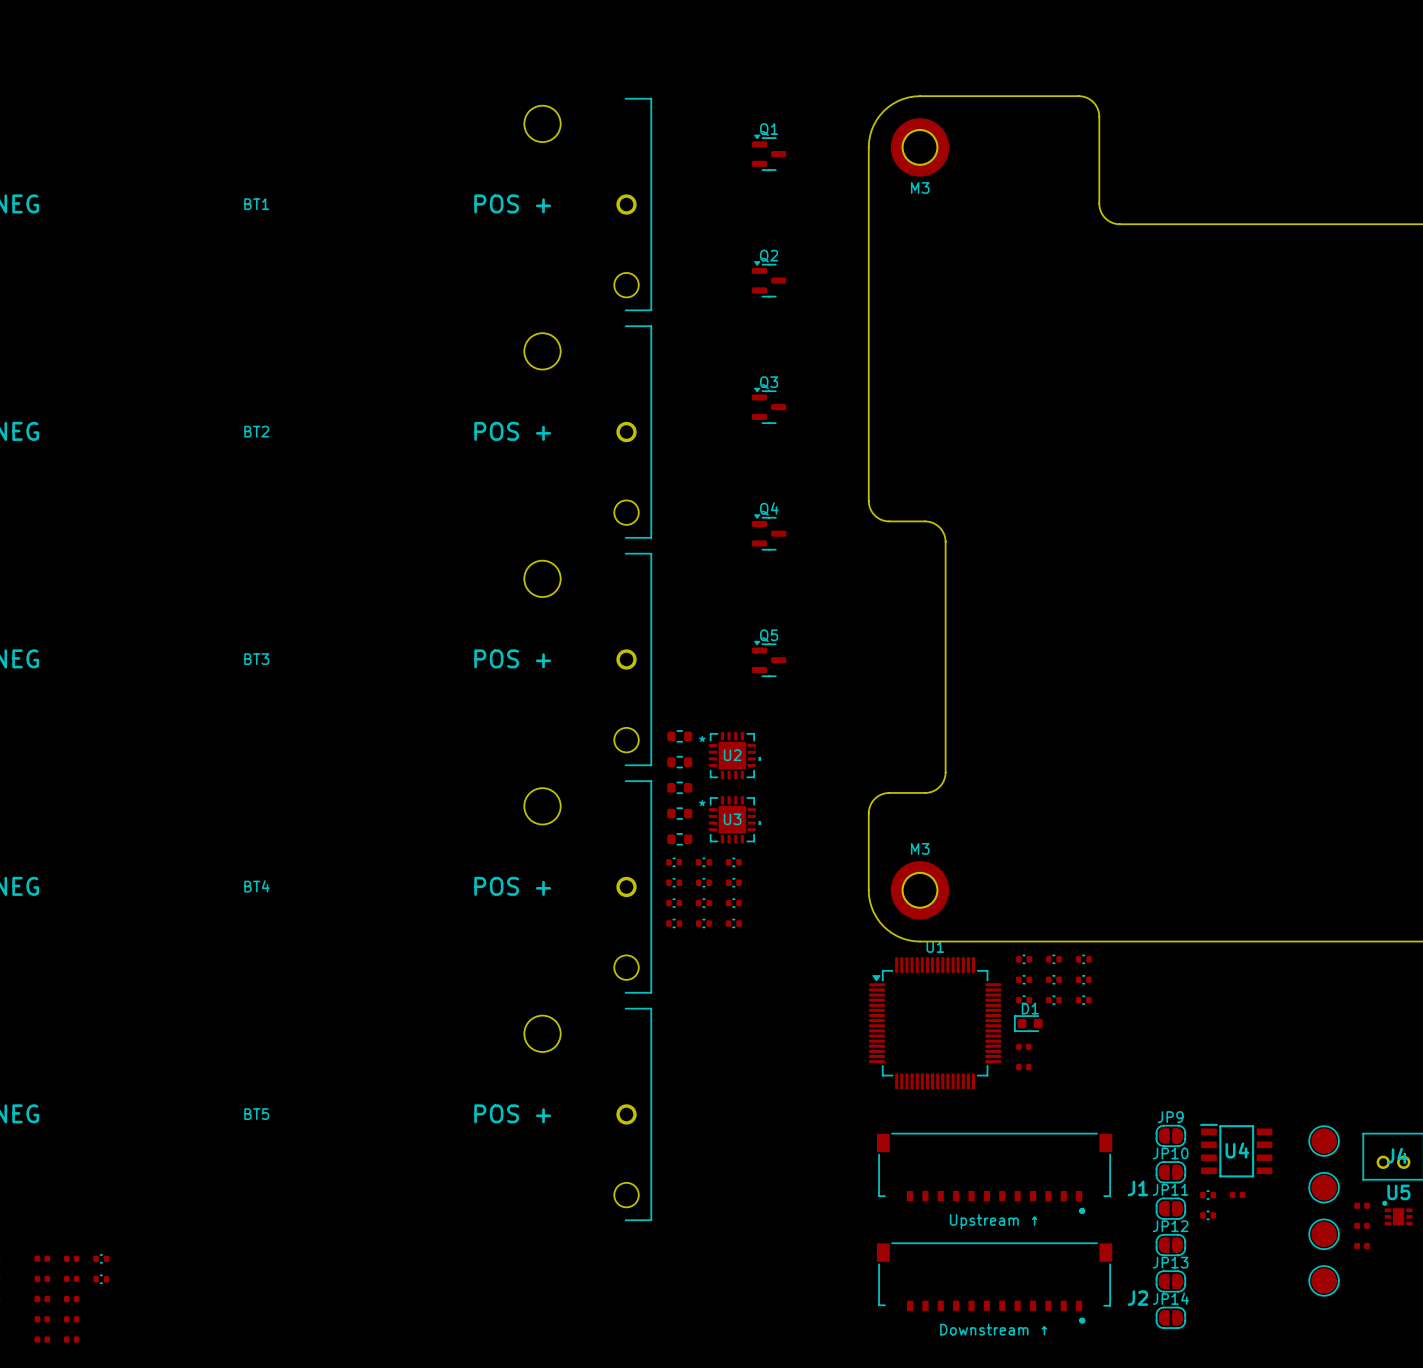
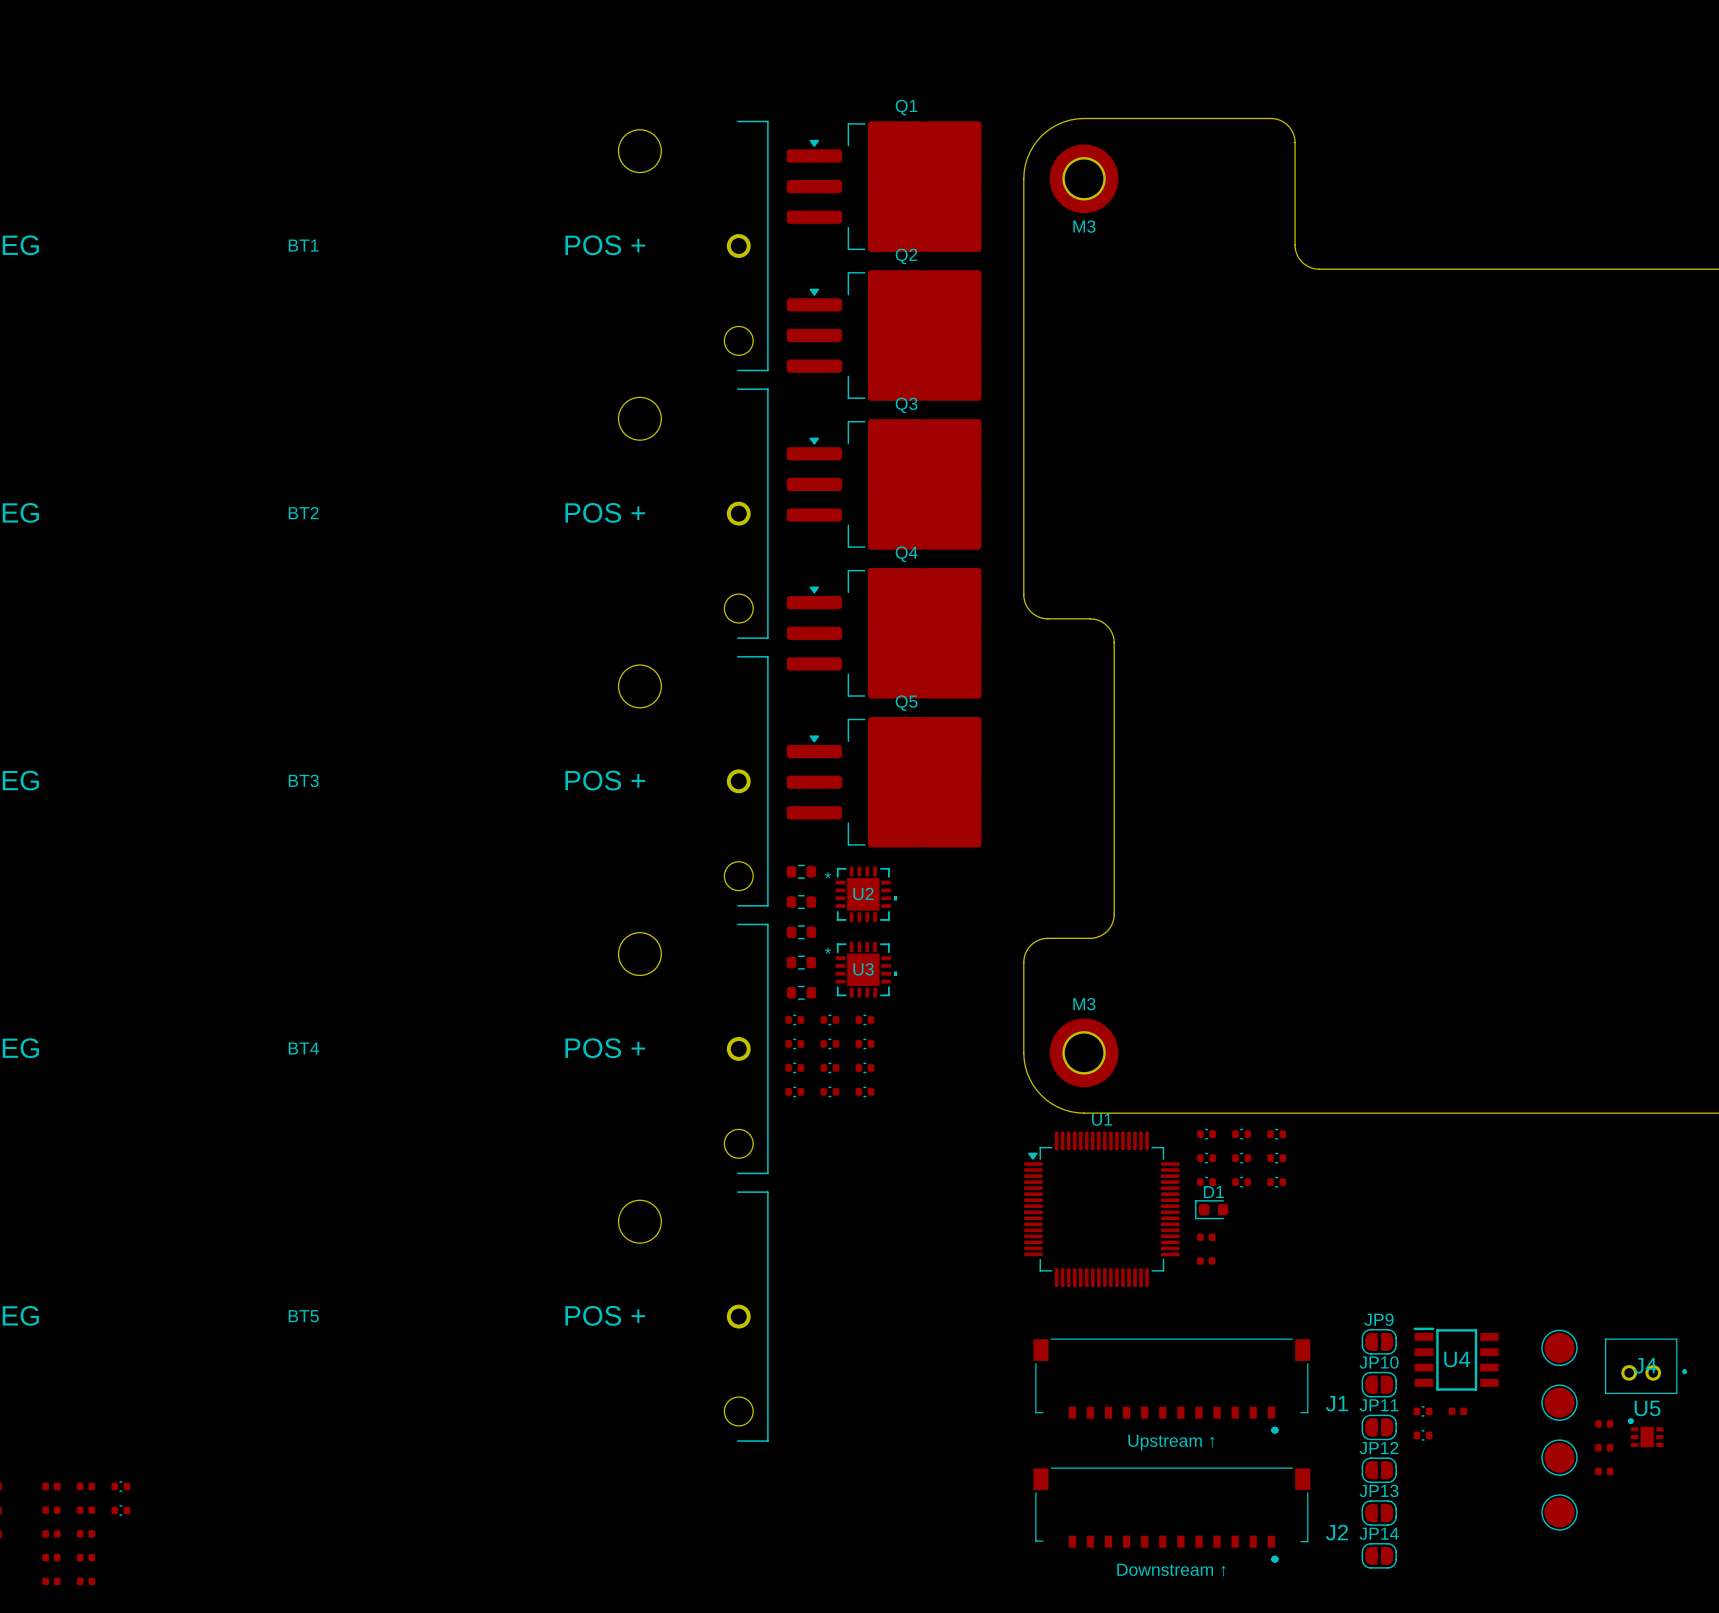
Q1 name position: Q1 (769, 129) -> Q1 (906, 107)
Q1 footprint: [751, 134, 787, 171] -> [786, 121, 982, 252]
Q2 name position: Q2 (769, 256) -> Q2 (906, 256)
Q2 footprint: [751, 261, 787, 298] -> [786, 270, 982, 401]
Q3 name position: Q3 (769, 382) -> Q3 (906, 405)
Q3 footprint: [751, 387, 787, 424] -> [786, 419, 982, 550]
Q4 name position: Q4 (769, 508) -> Q4 (906, 554)
Q4 footprint: [751, 514, 787, 551] -> [786, 568, 982, 699]
Q5 name position: Q5 (769, 635) -> Q5 (906, 703)
Q5 footprint: [751, 640, 787, 677] -> [786, 717, 982, 848]

